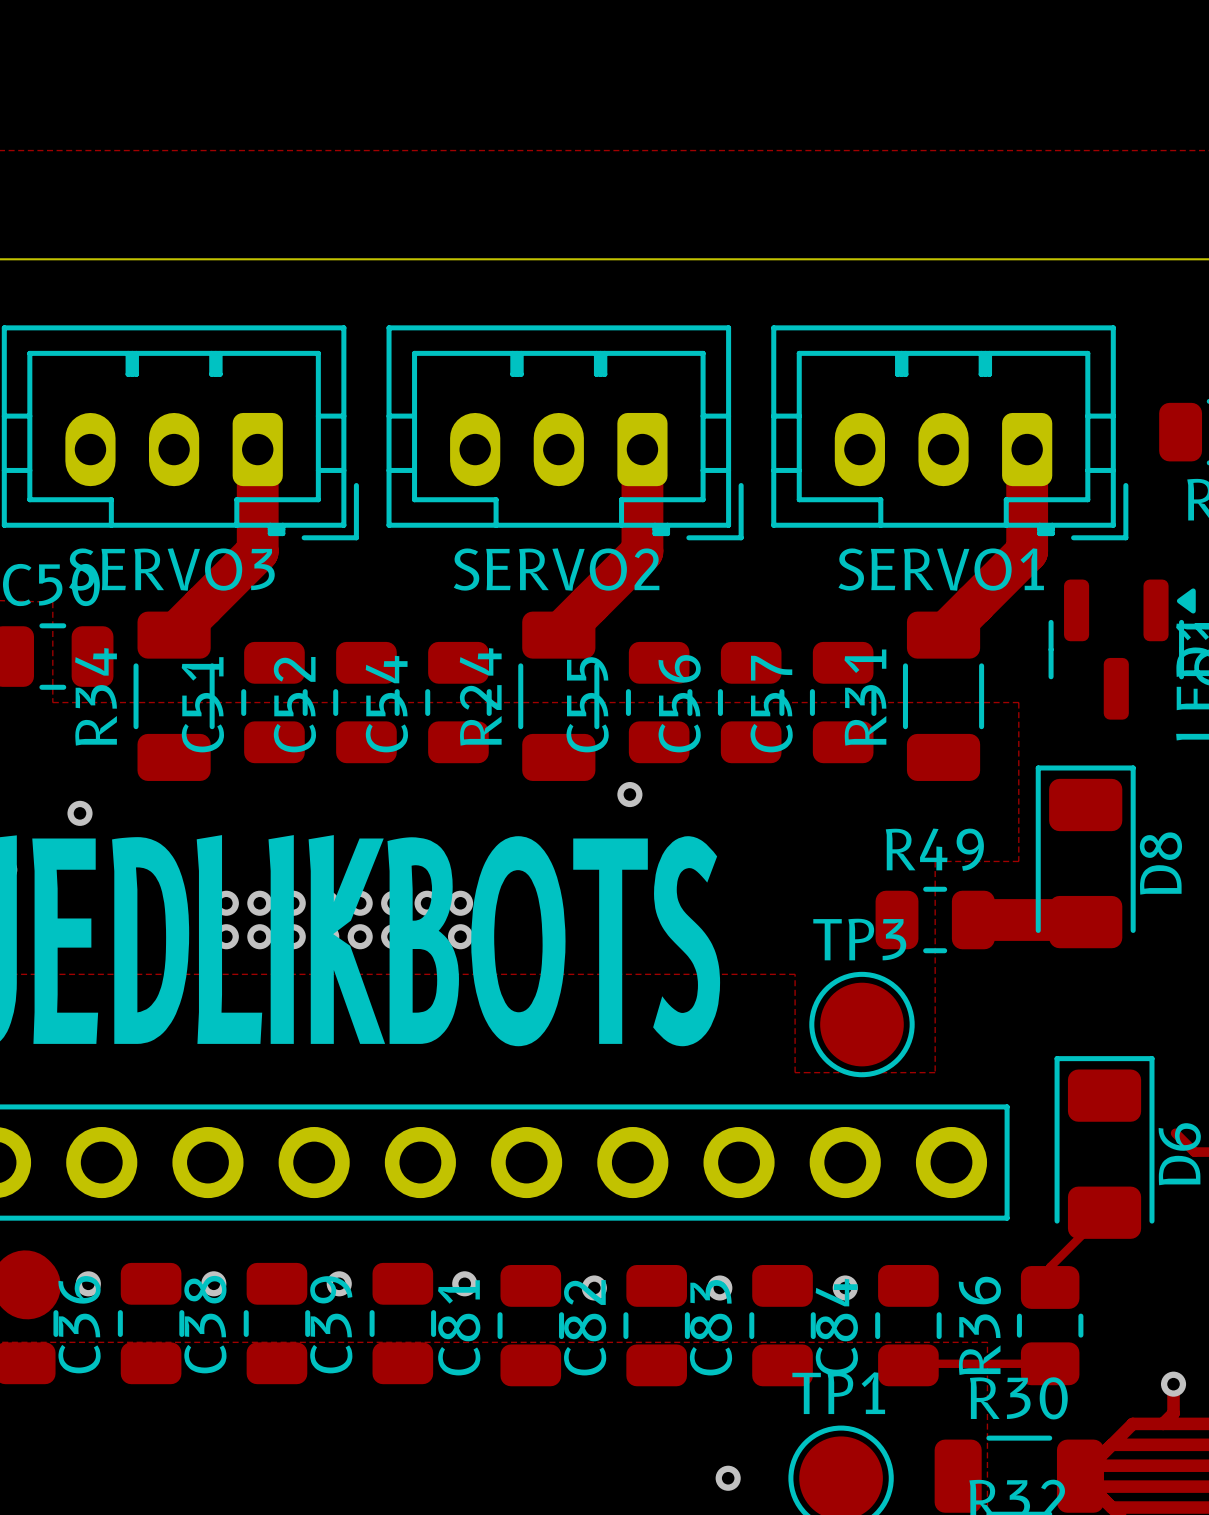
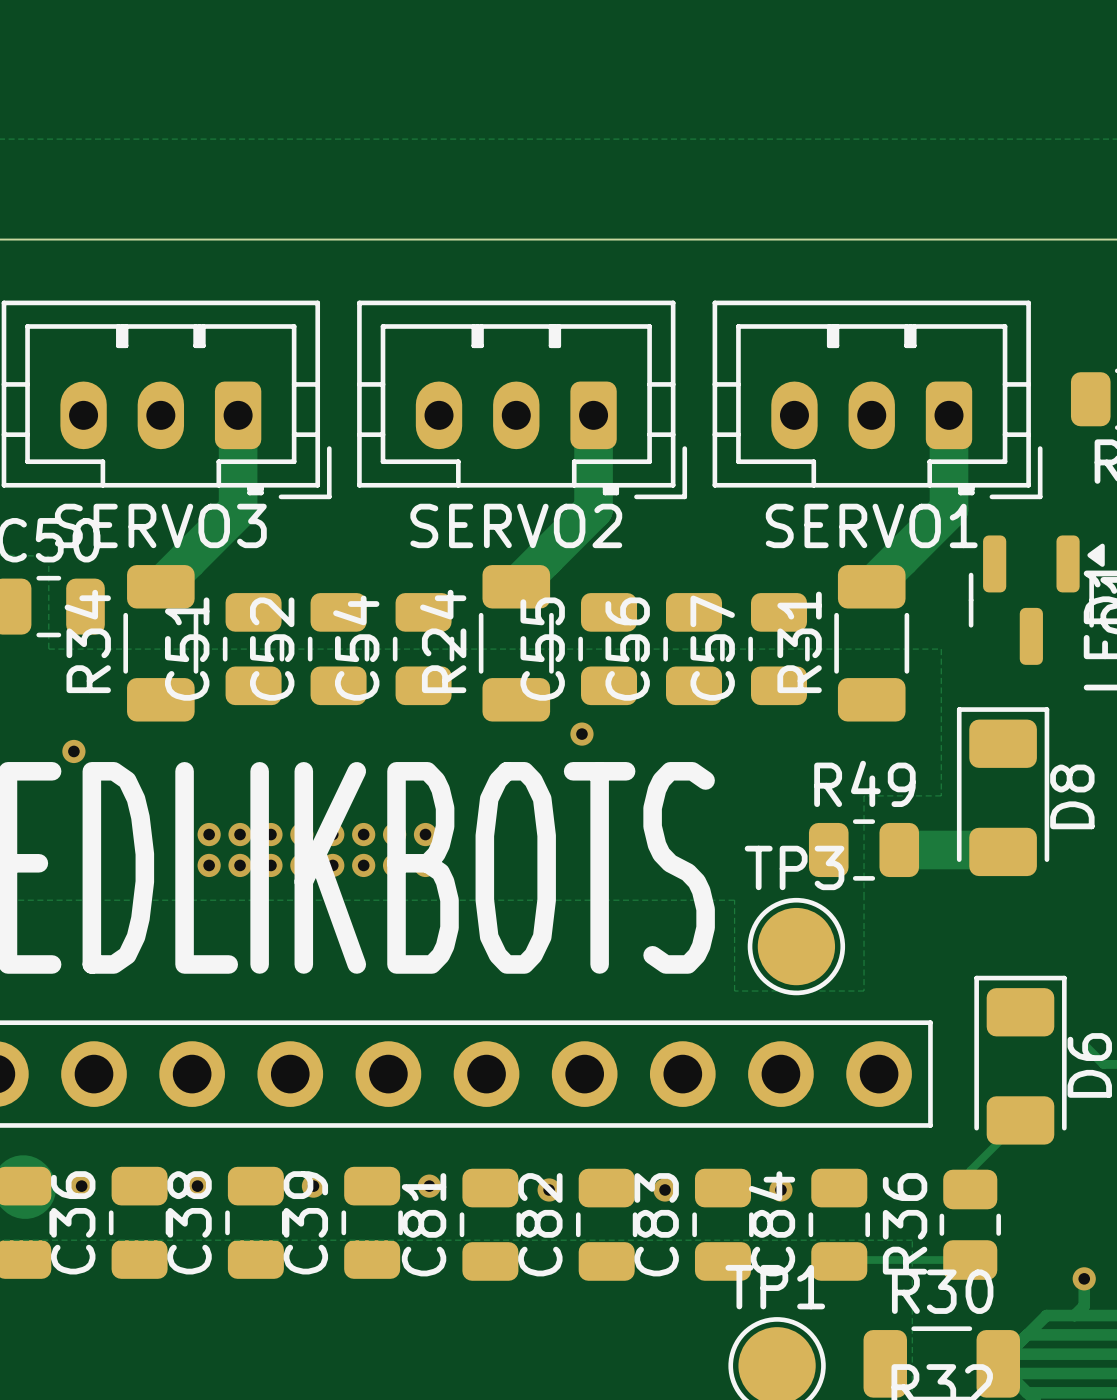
via: (728, 1478) -> none

